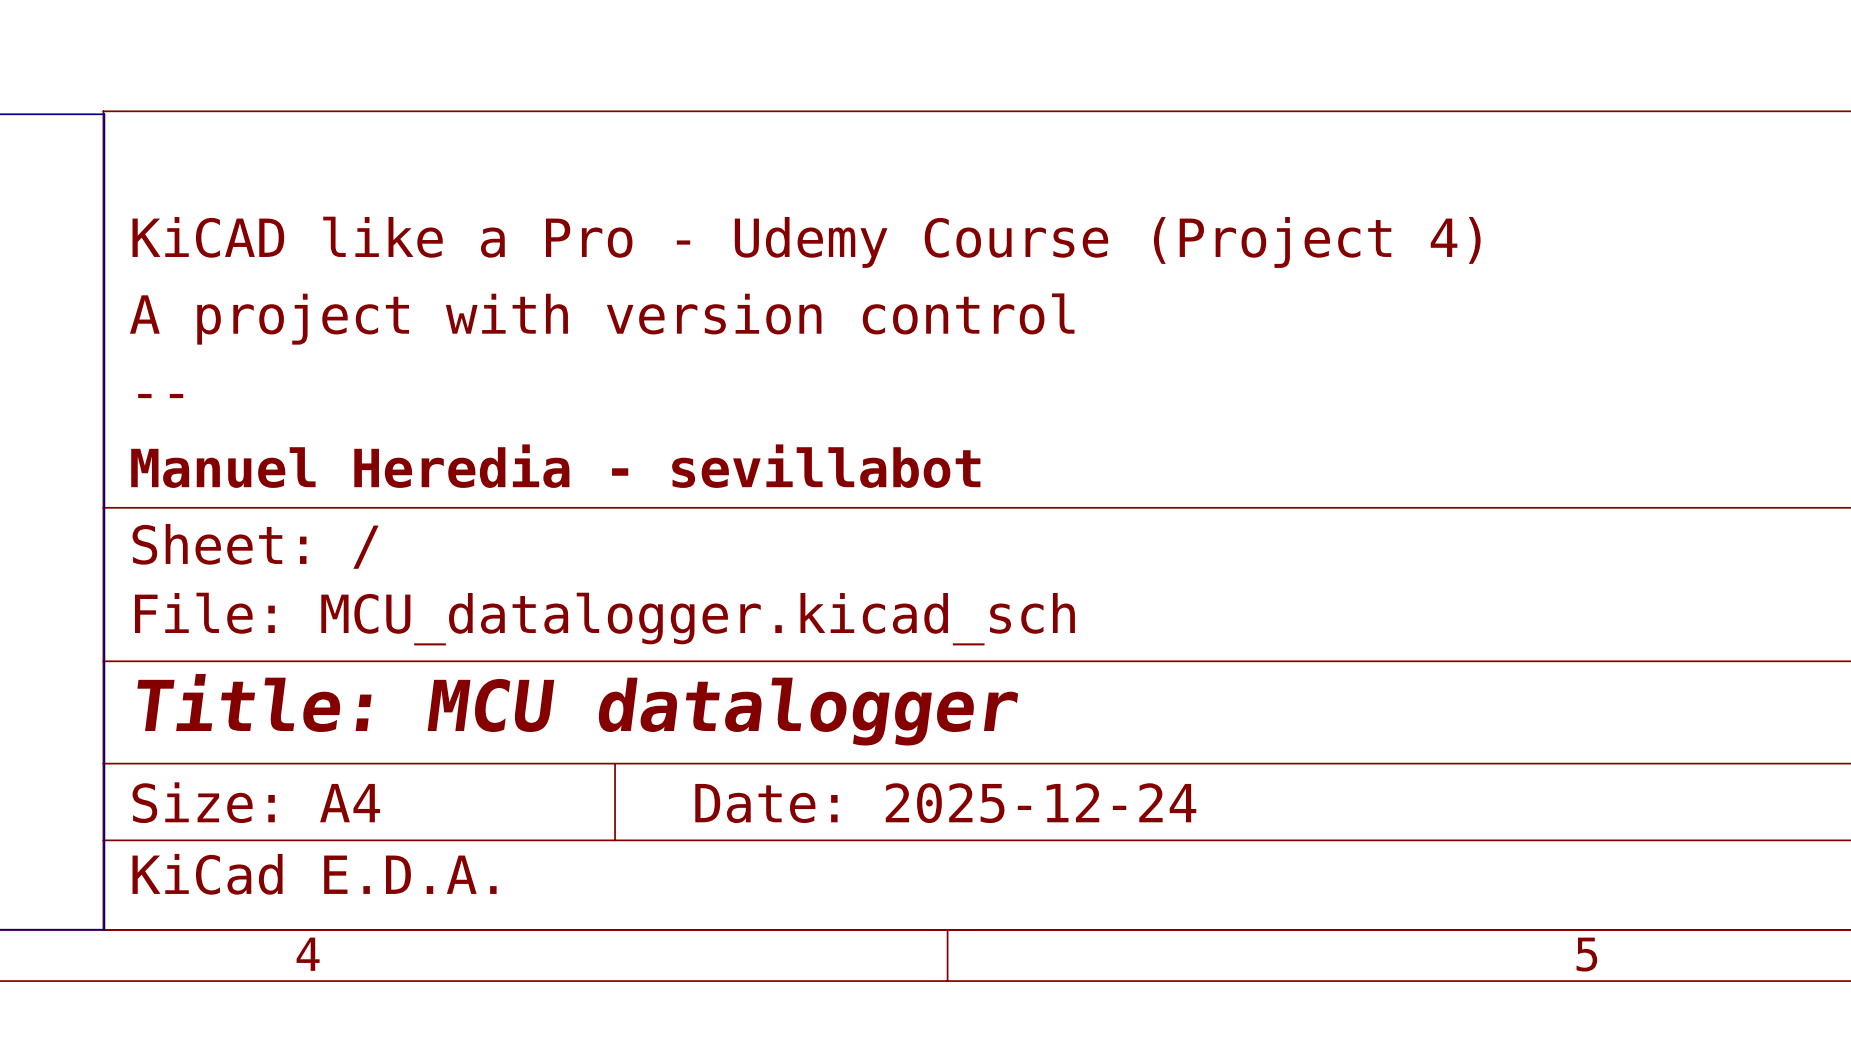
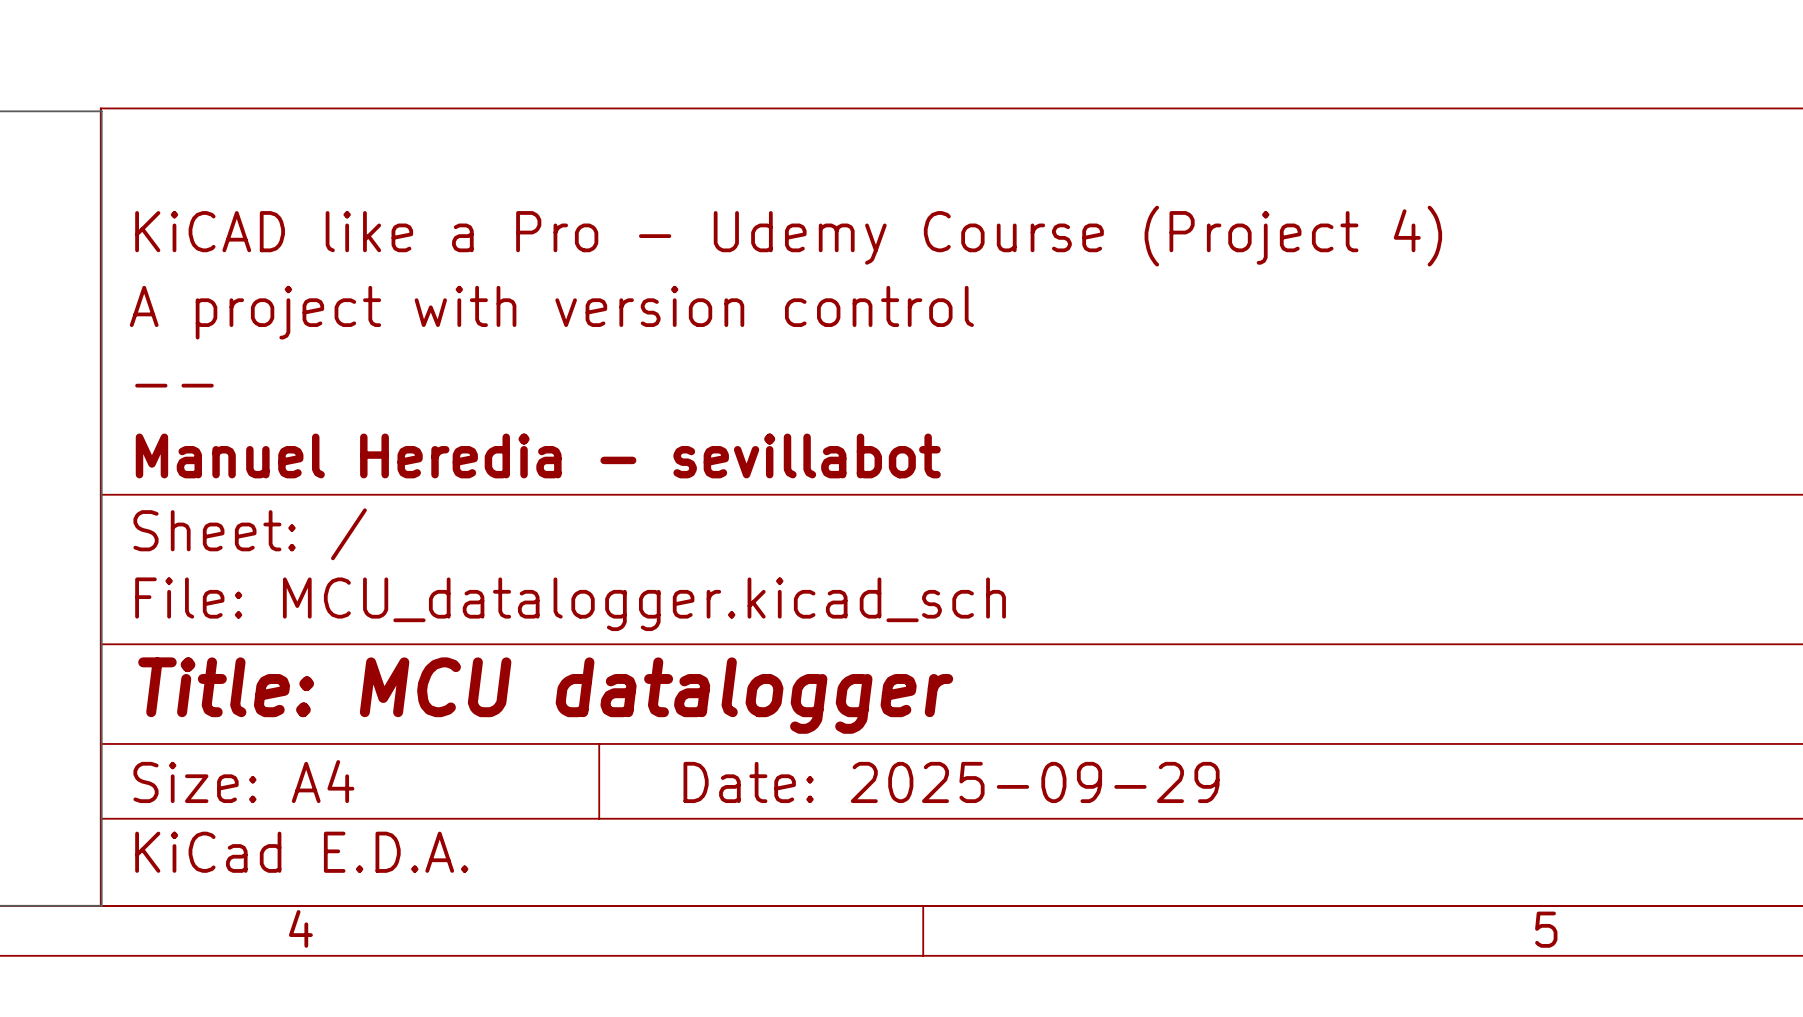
title block: Date: 2025-12-24 (945, 803) -> Date: 2025-09-29 (951, 782)

